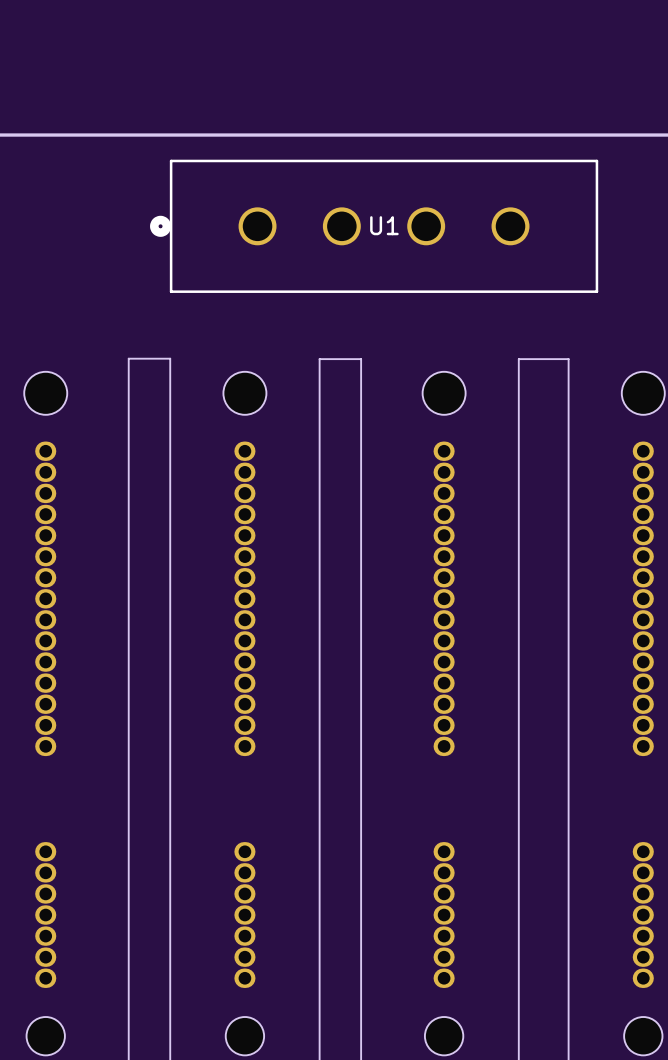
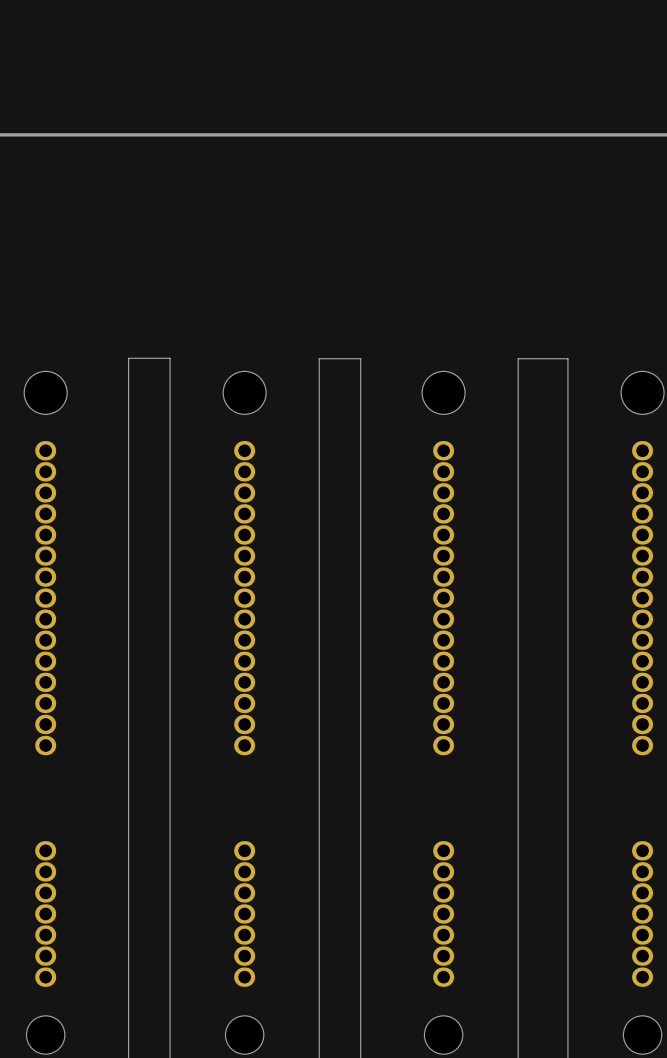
U1: (374, 226) -> none

